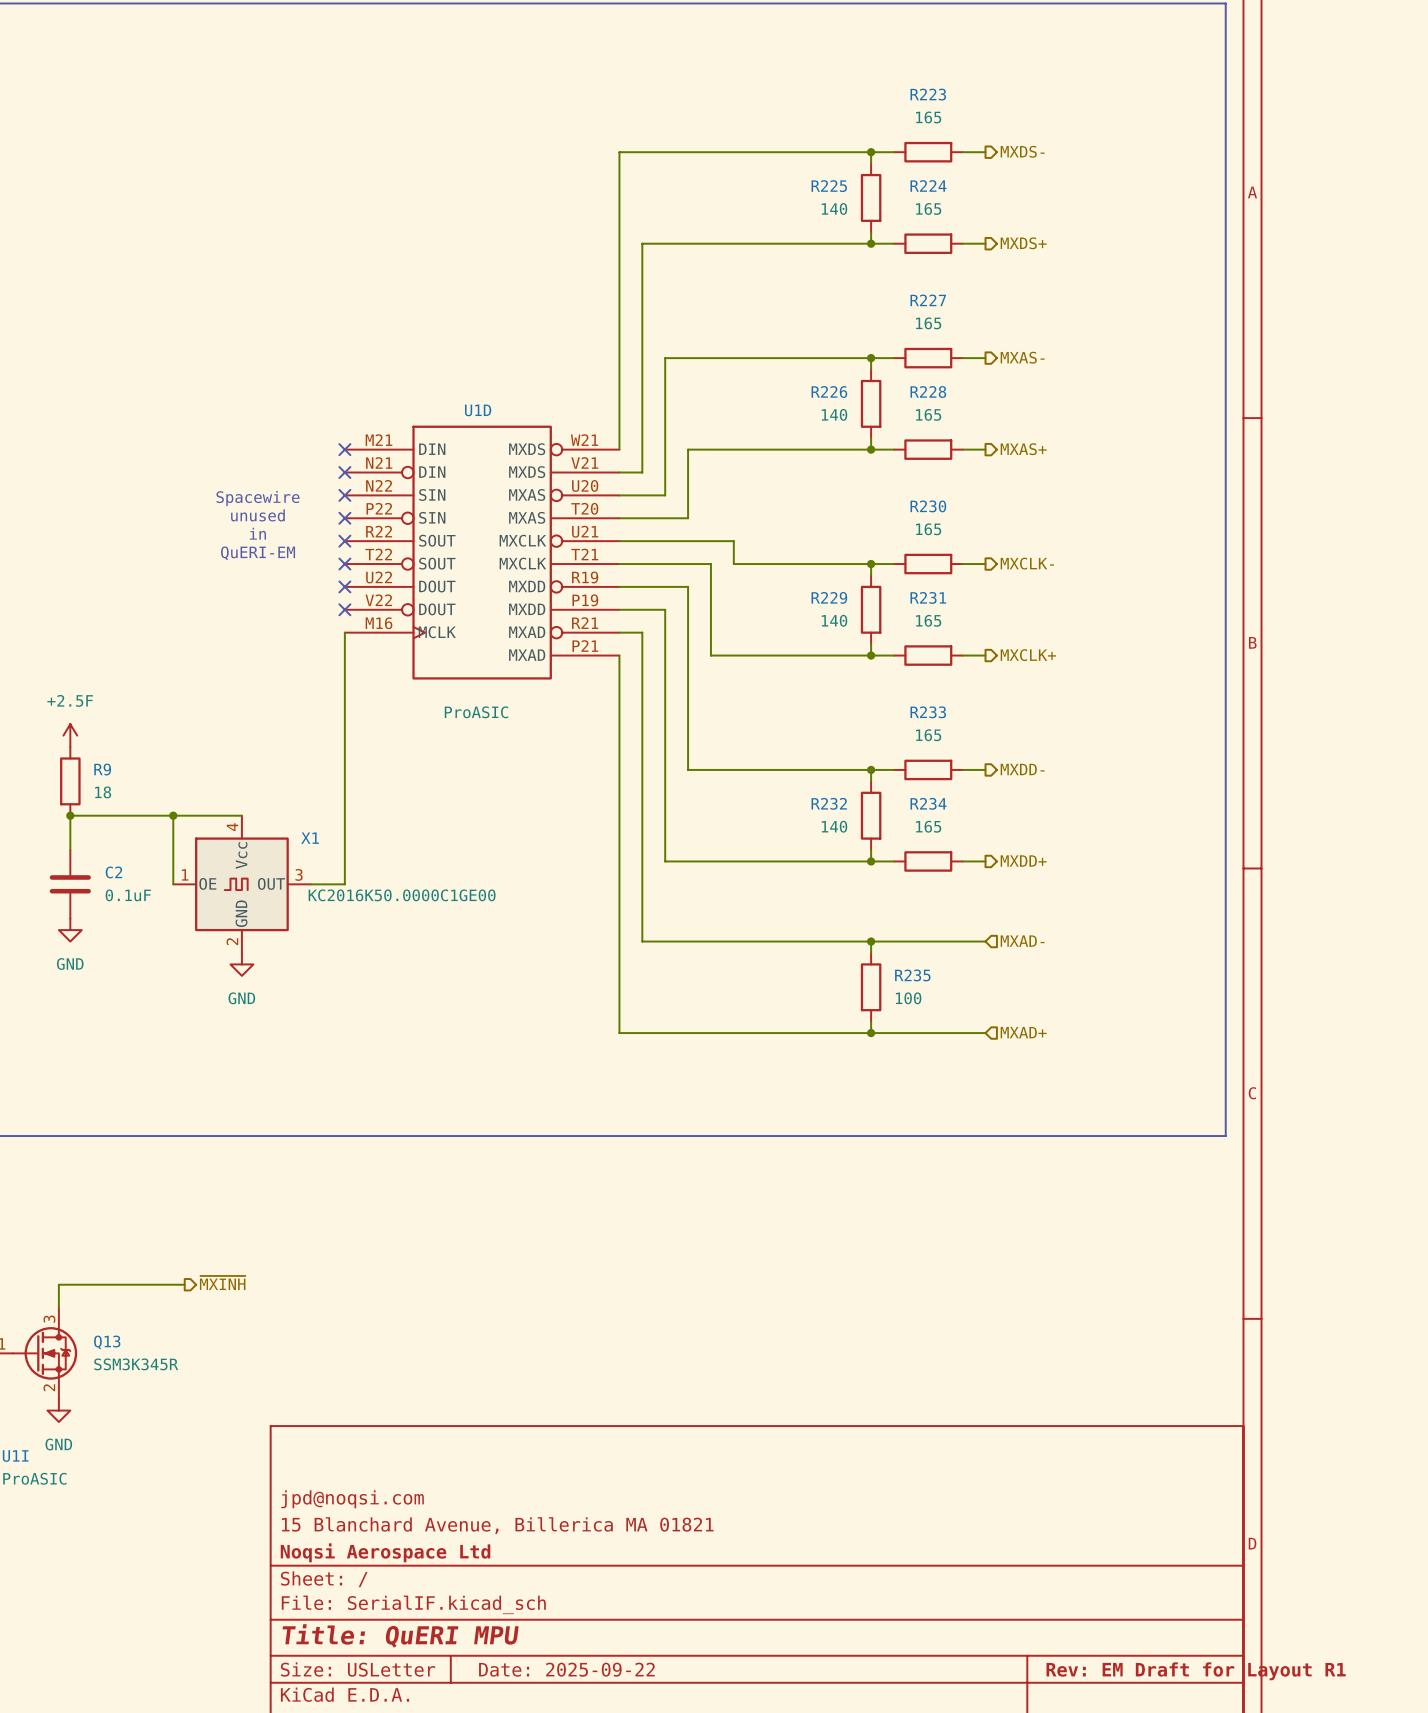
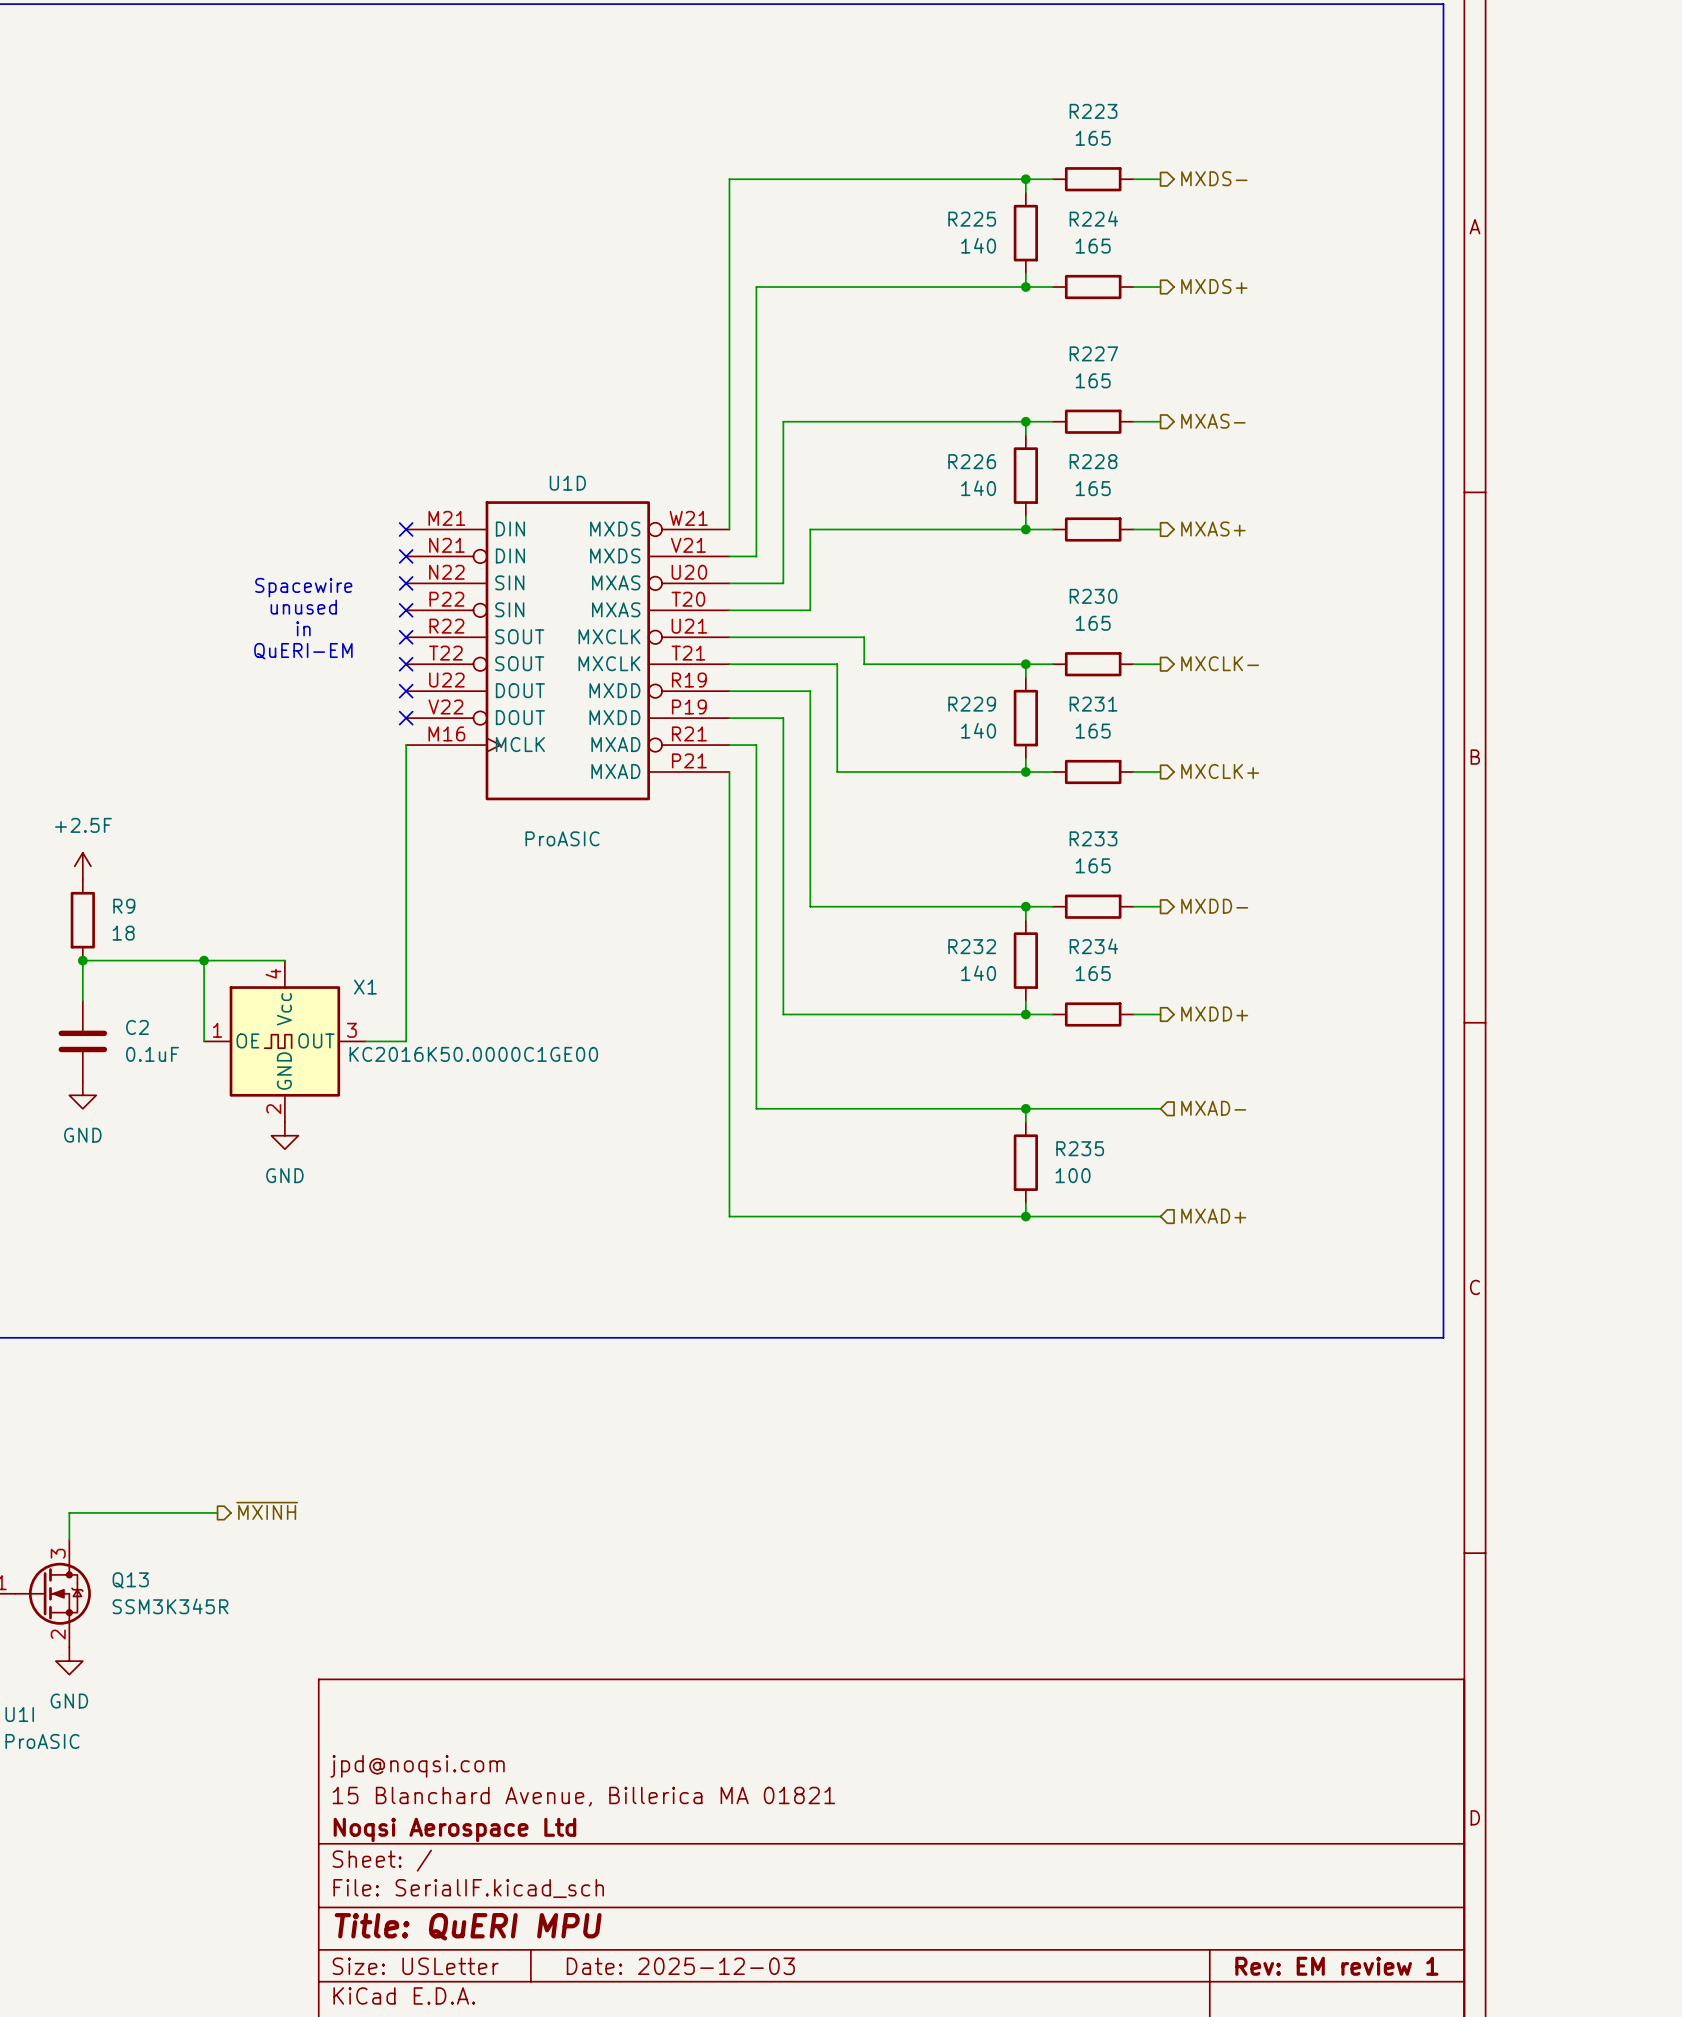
title block: Date: 2025-09-22 (566, 1669) -> Date: 2025-12-03 (680, 1966)
title block: Rev: EM Draft for Layout R1 (1196, 1671) -> Rev: EM review 1 (1336, 1966)

